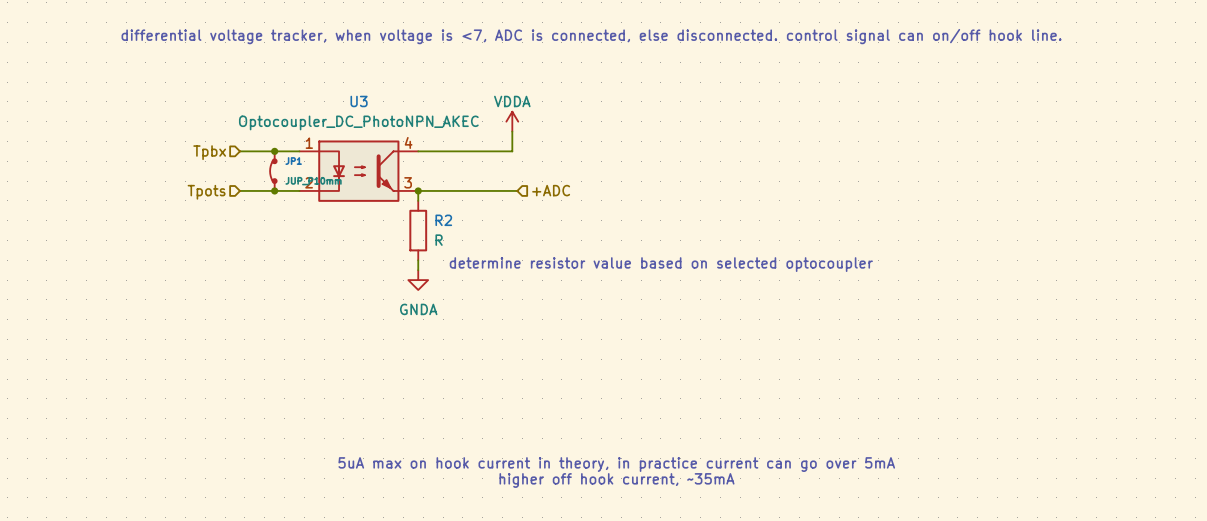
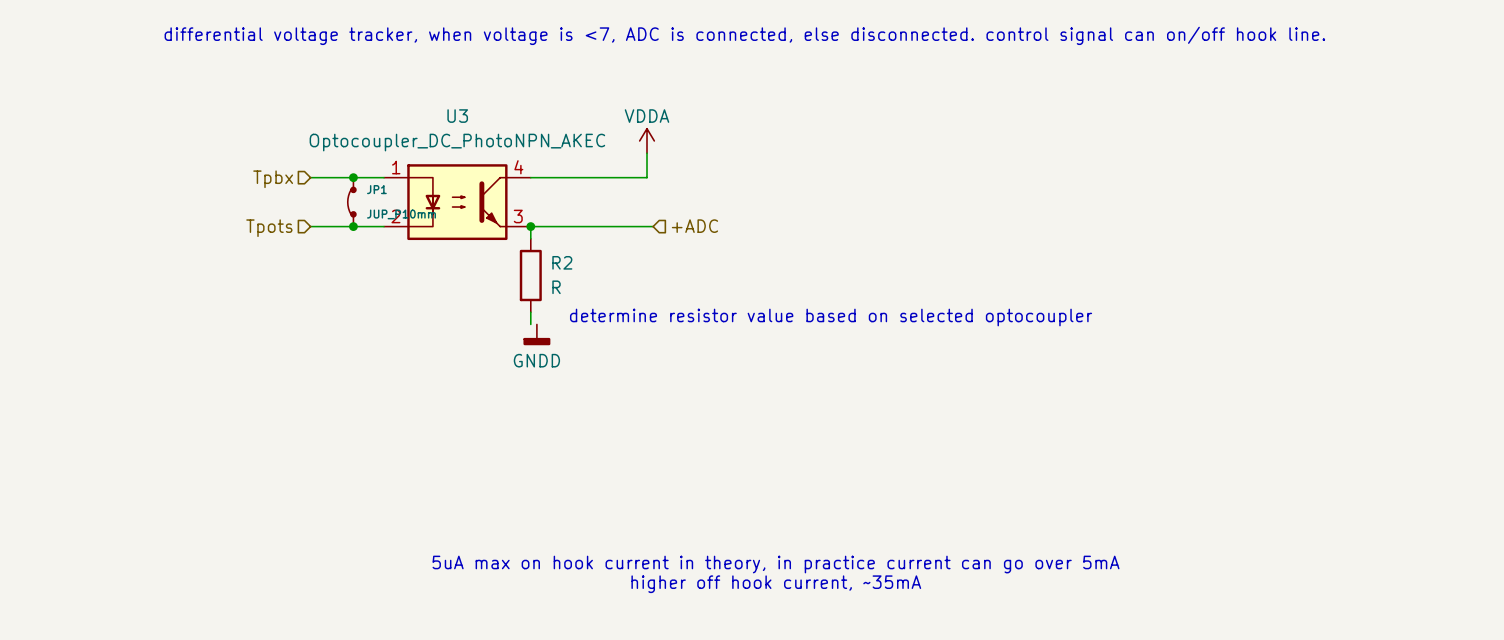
power symbol: GNDA (418, 280) -> GNDD (536, 334)

